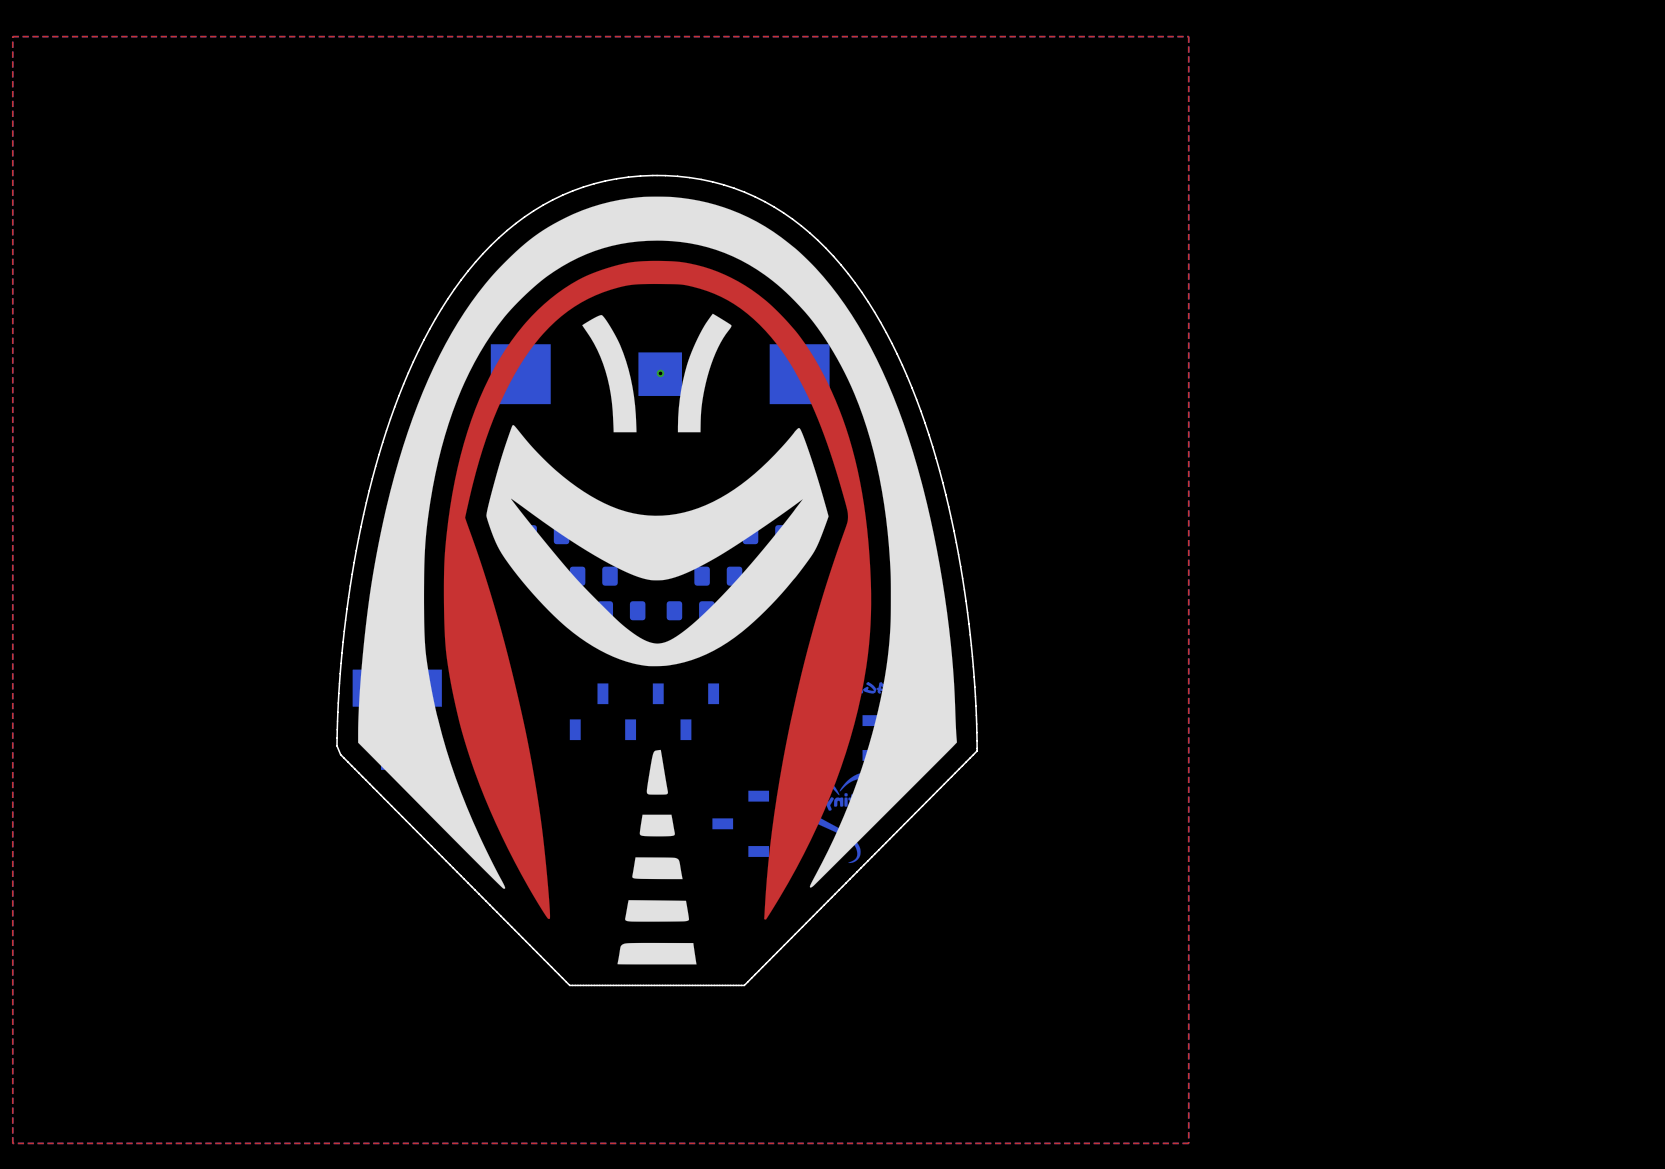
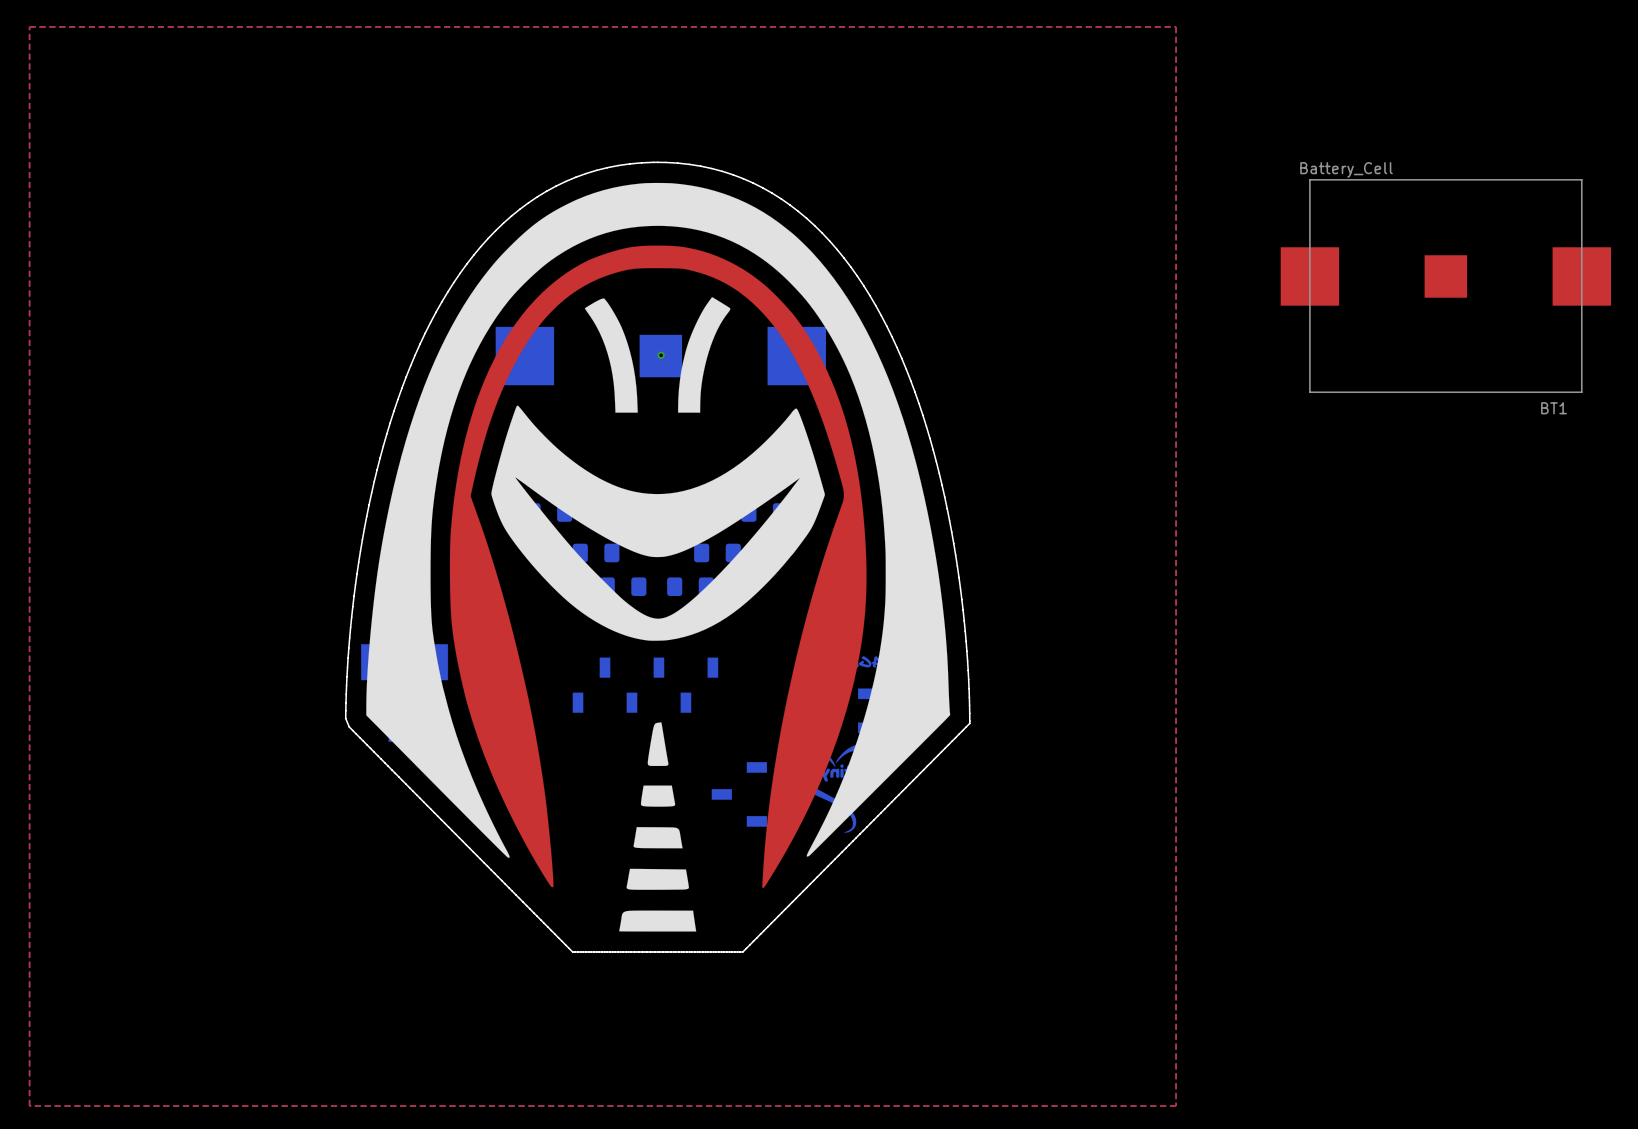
BT1: none -> Battery_Cell (1445, 286)

